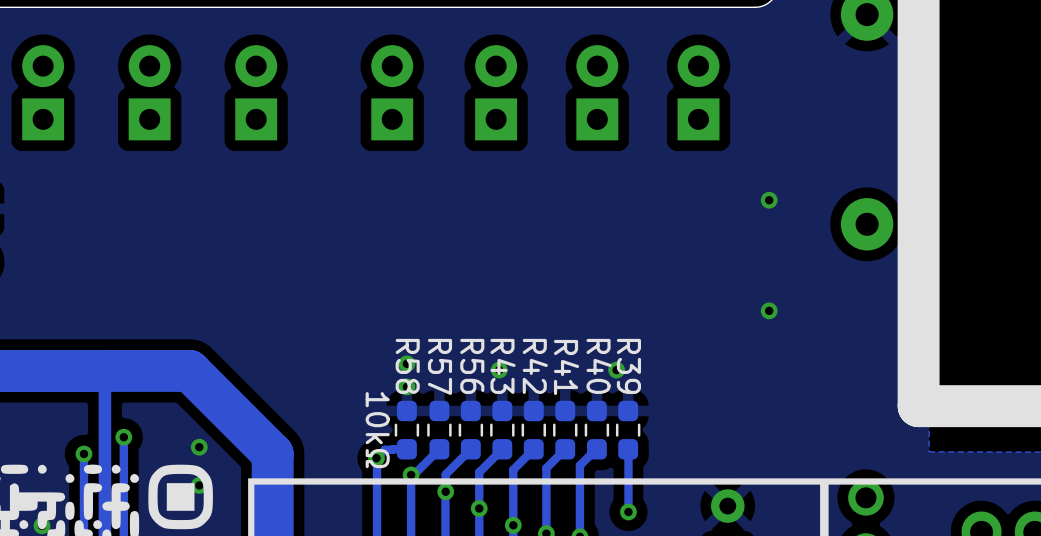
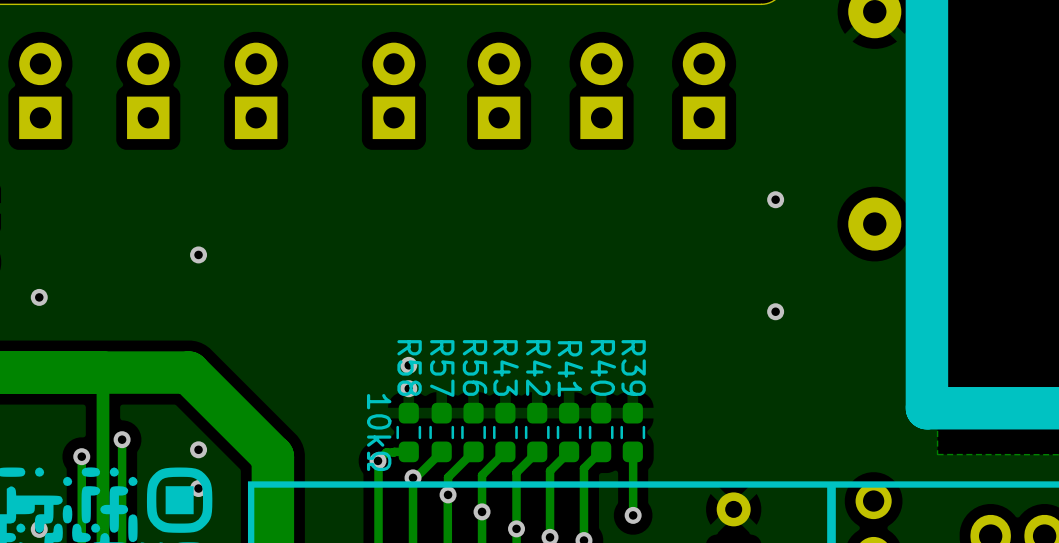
via: none -> (198, 254)
via: none -> (39, 297)
via: (499, 370) -> none
via: (616, 370) -> none

